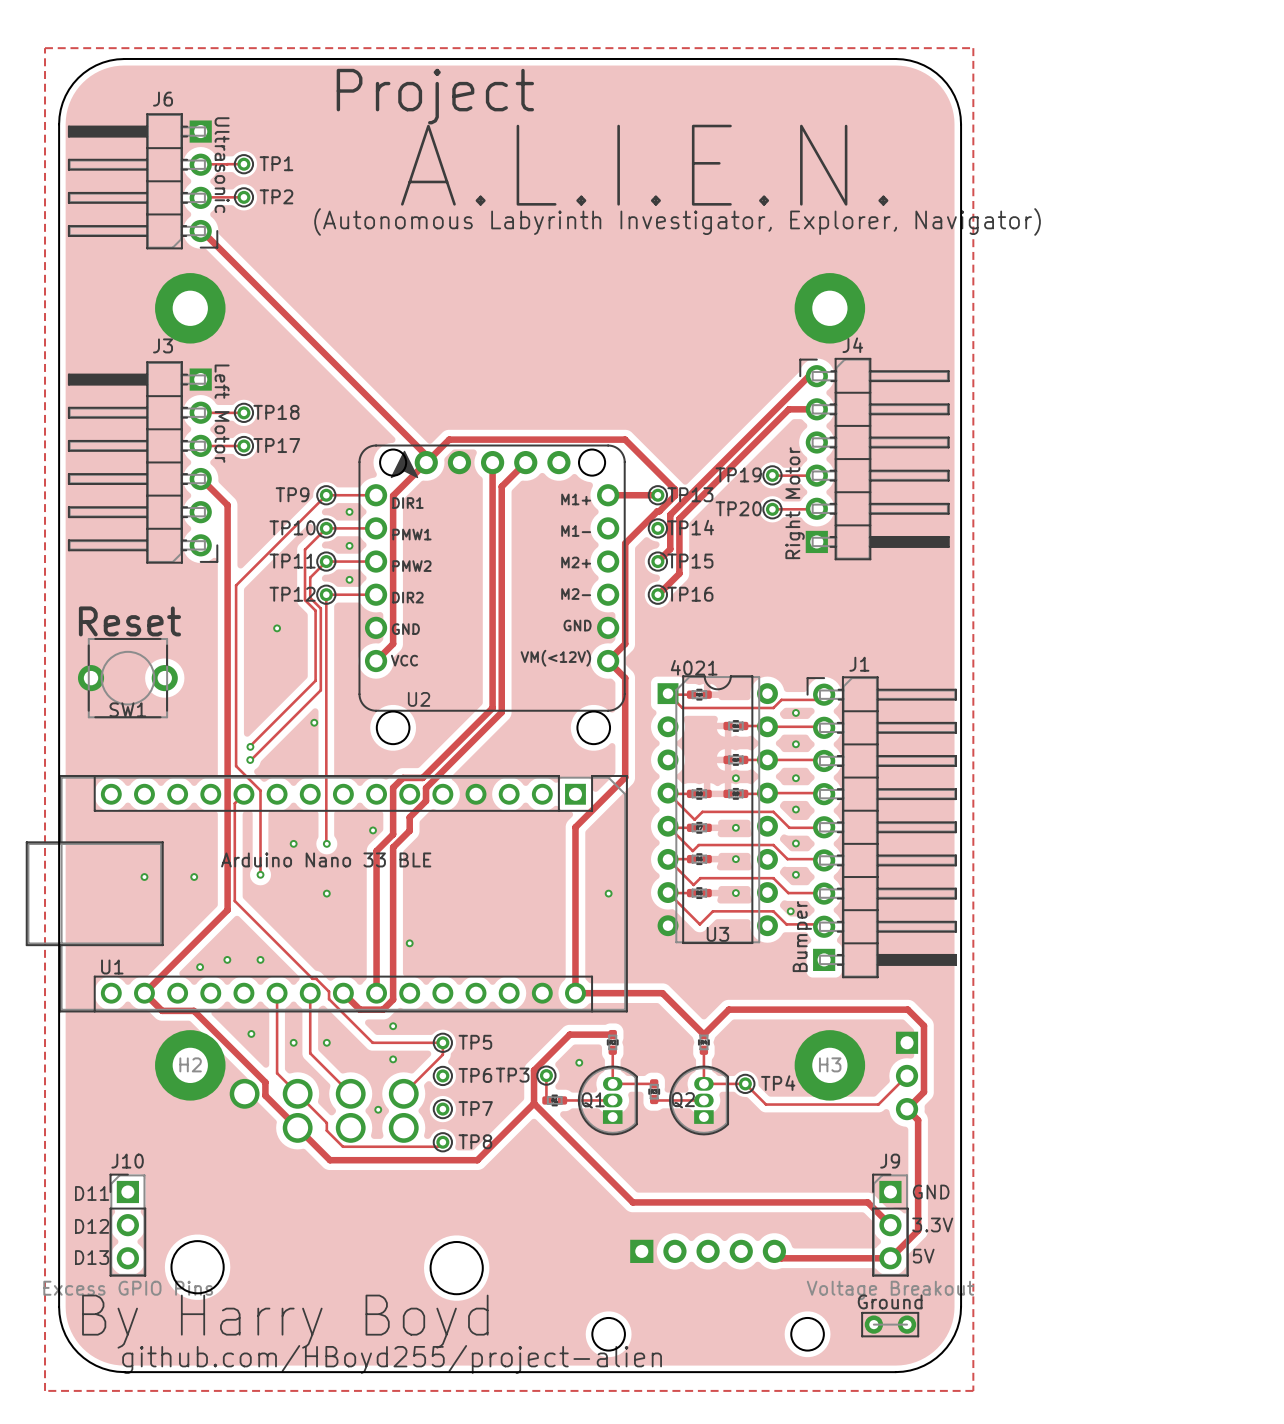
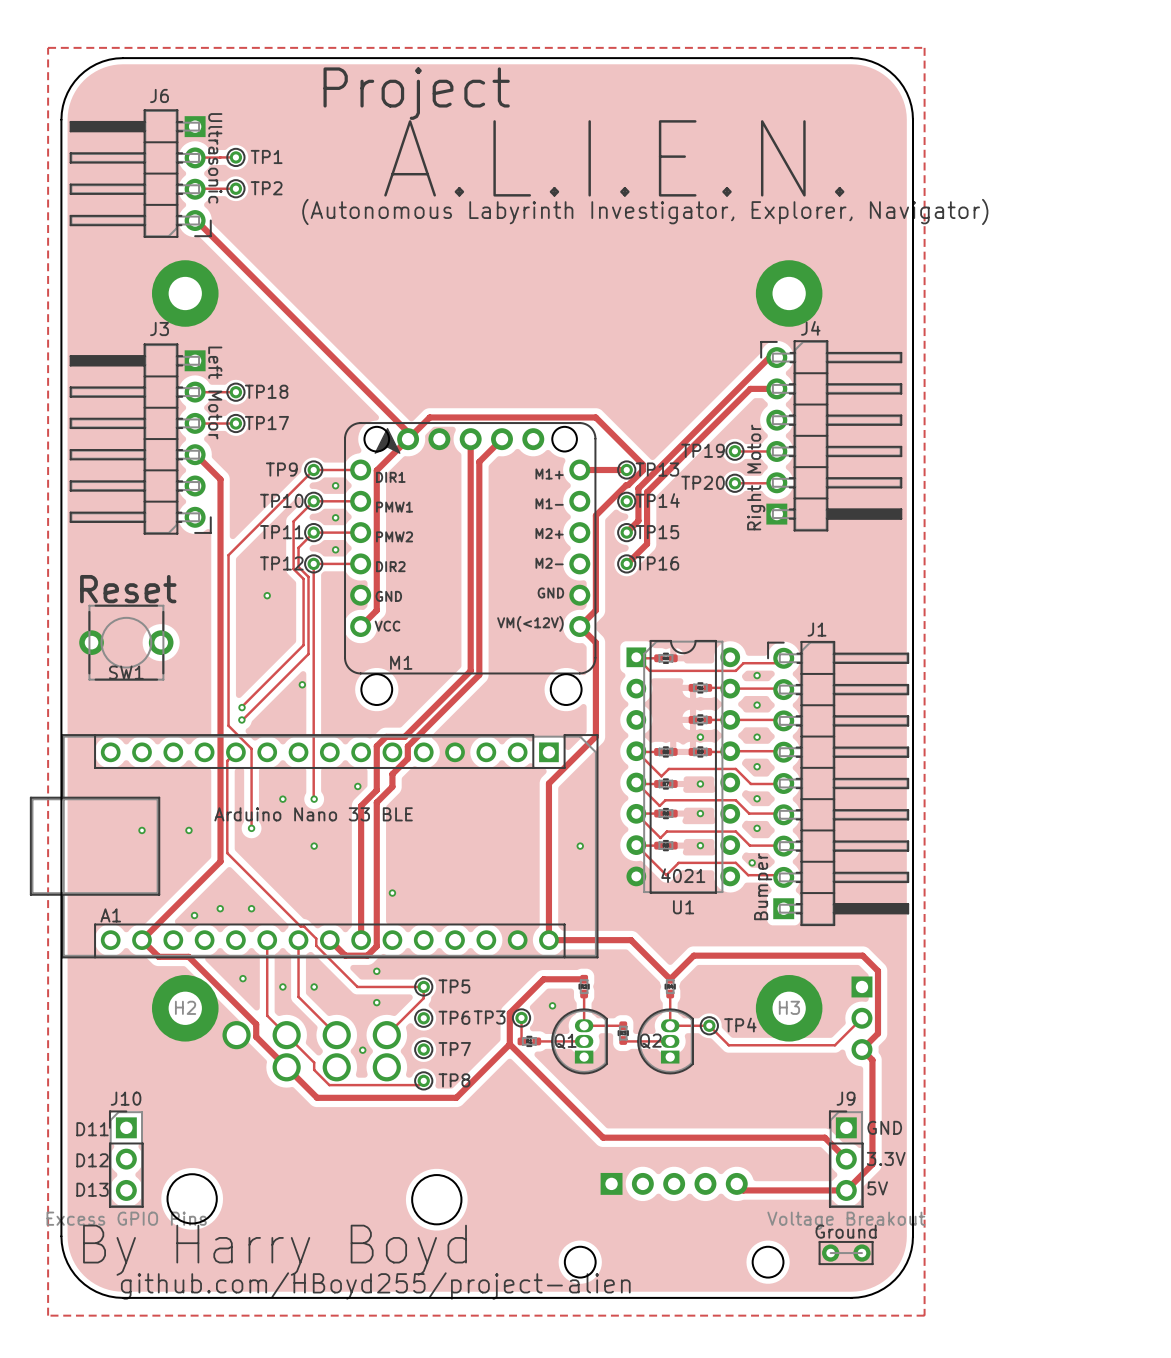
U3 value position: 4021 (694, 667) -> 4021 (683, 875)
U2 name: U2 (419, 699) -> M1 (401, 662)
U3 name: U3 (717, 934) -> U1 (683, 907)
U1 name: U1 (112, 966) -> A1 (110, 915)

